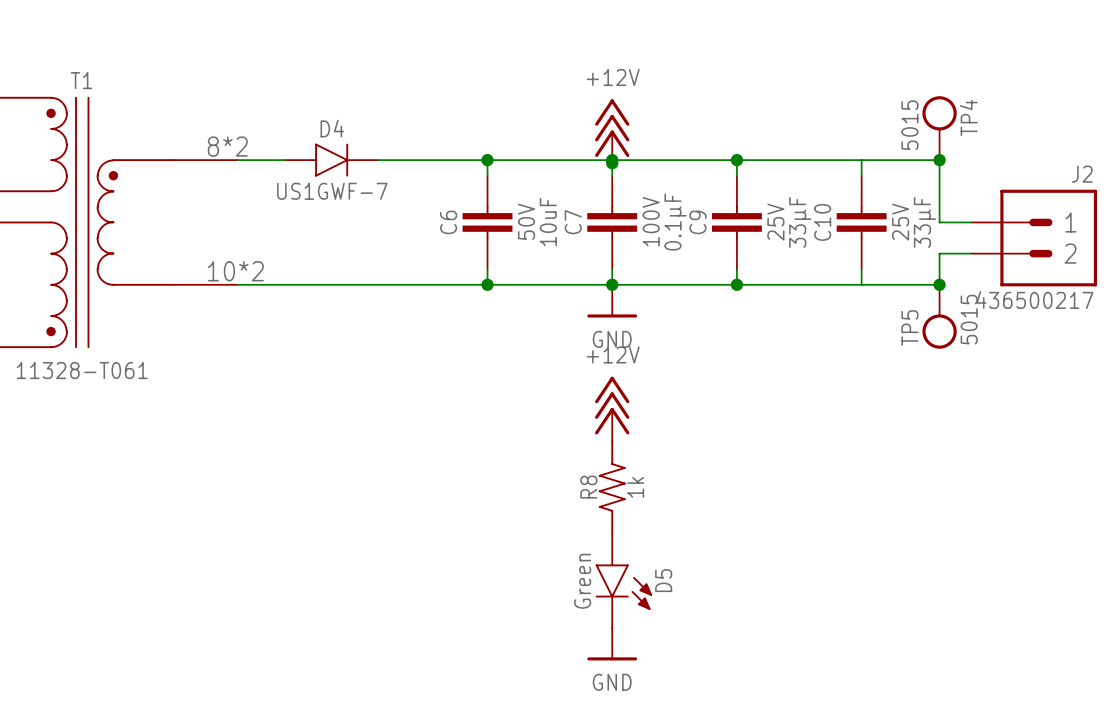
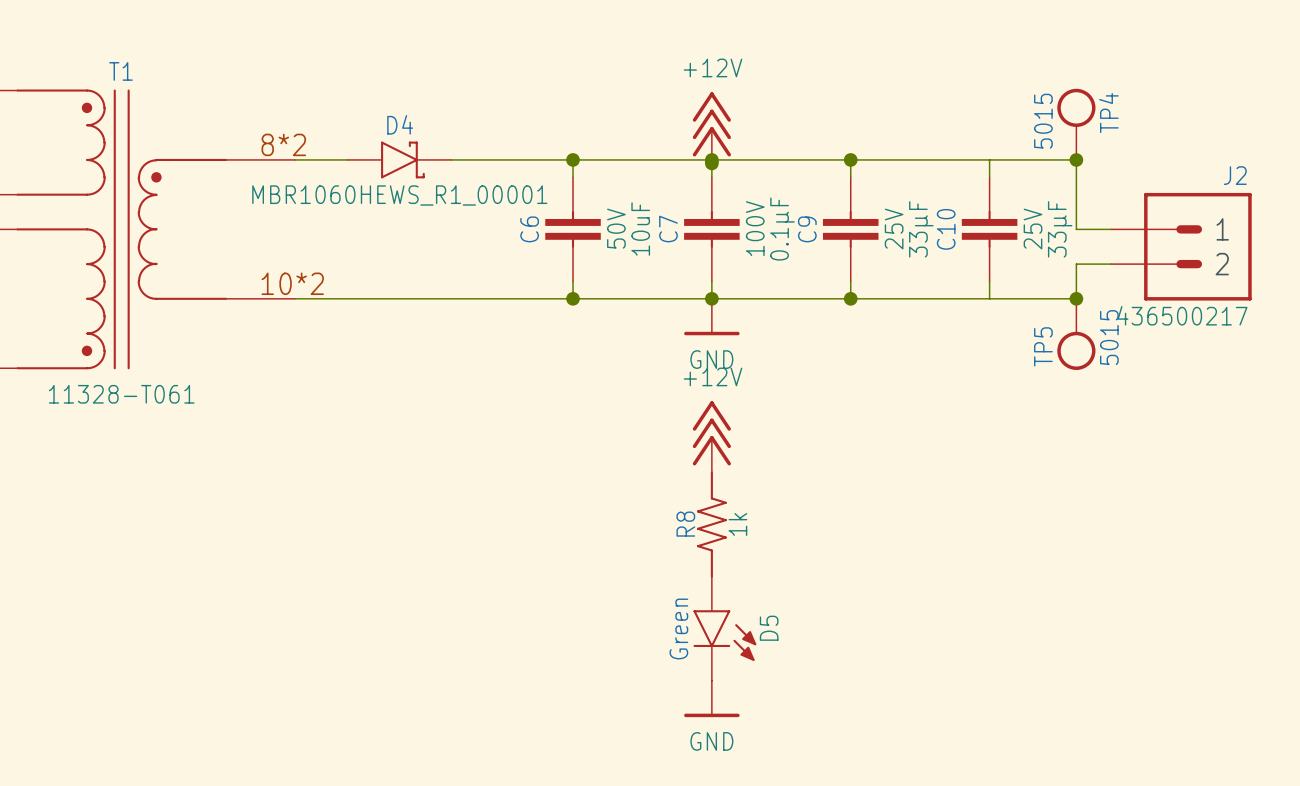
D4 symbol: [284, 143, 379, 177] -> [347, 141, 452, 179]
D4 text: US1GWF-7 (332, 191) -> MBR1060HEWS_R1_00001 (399, 195)

